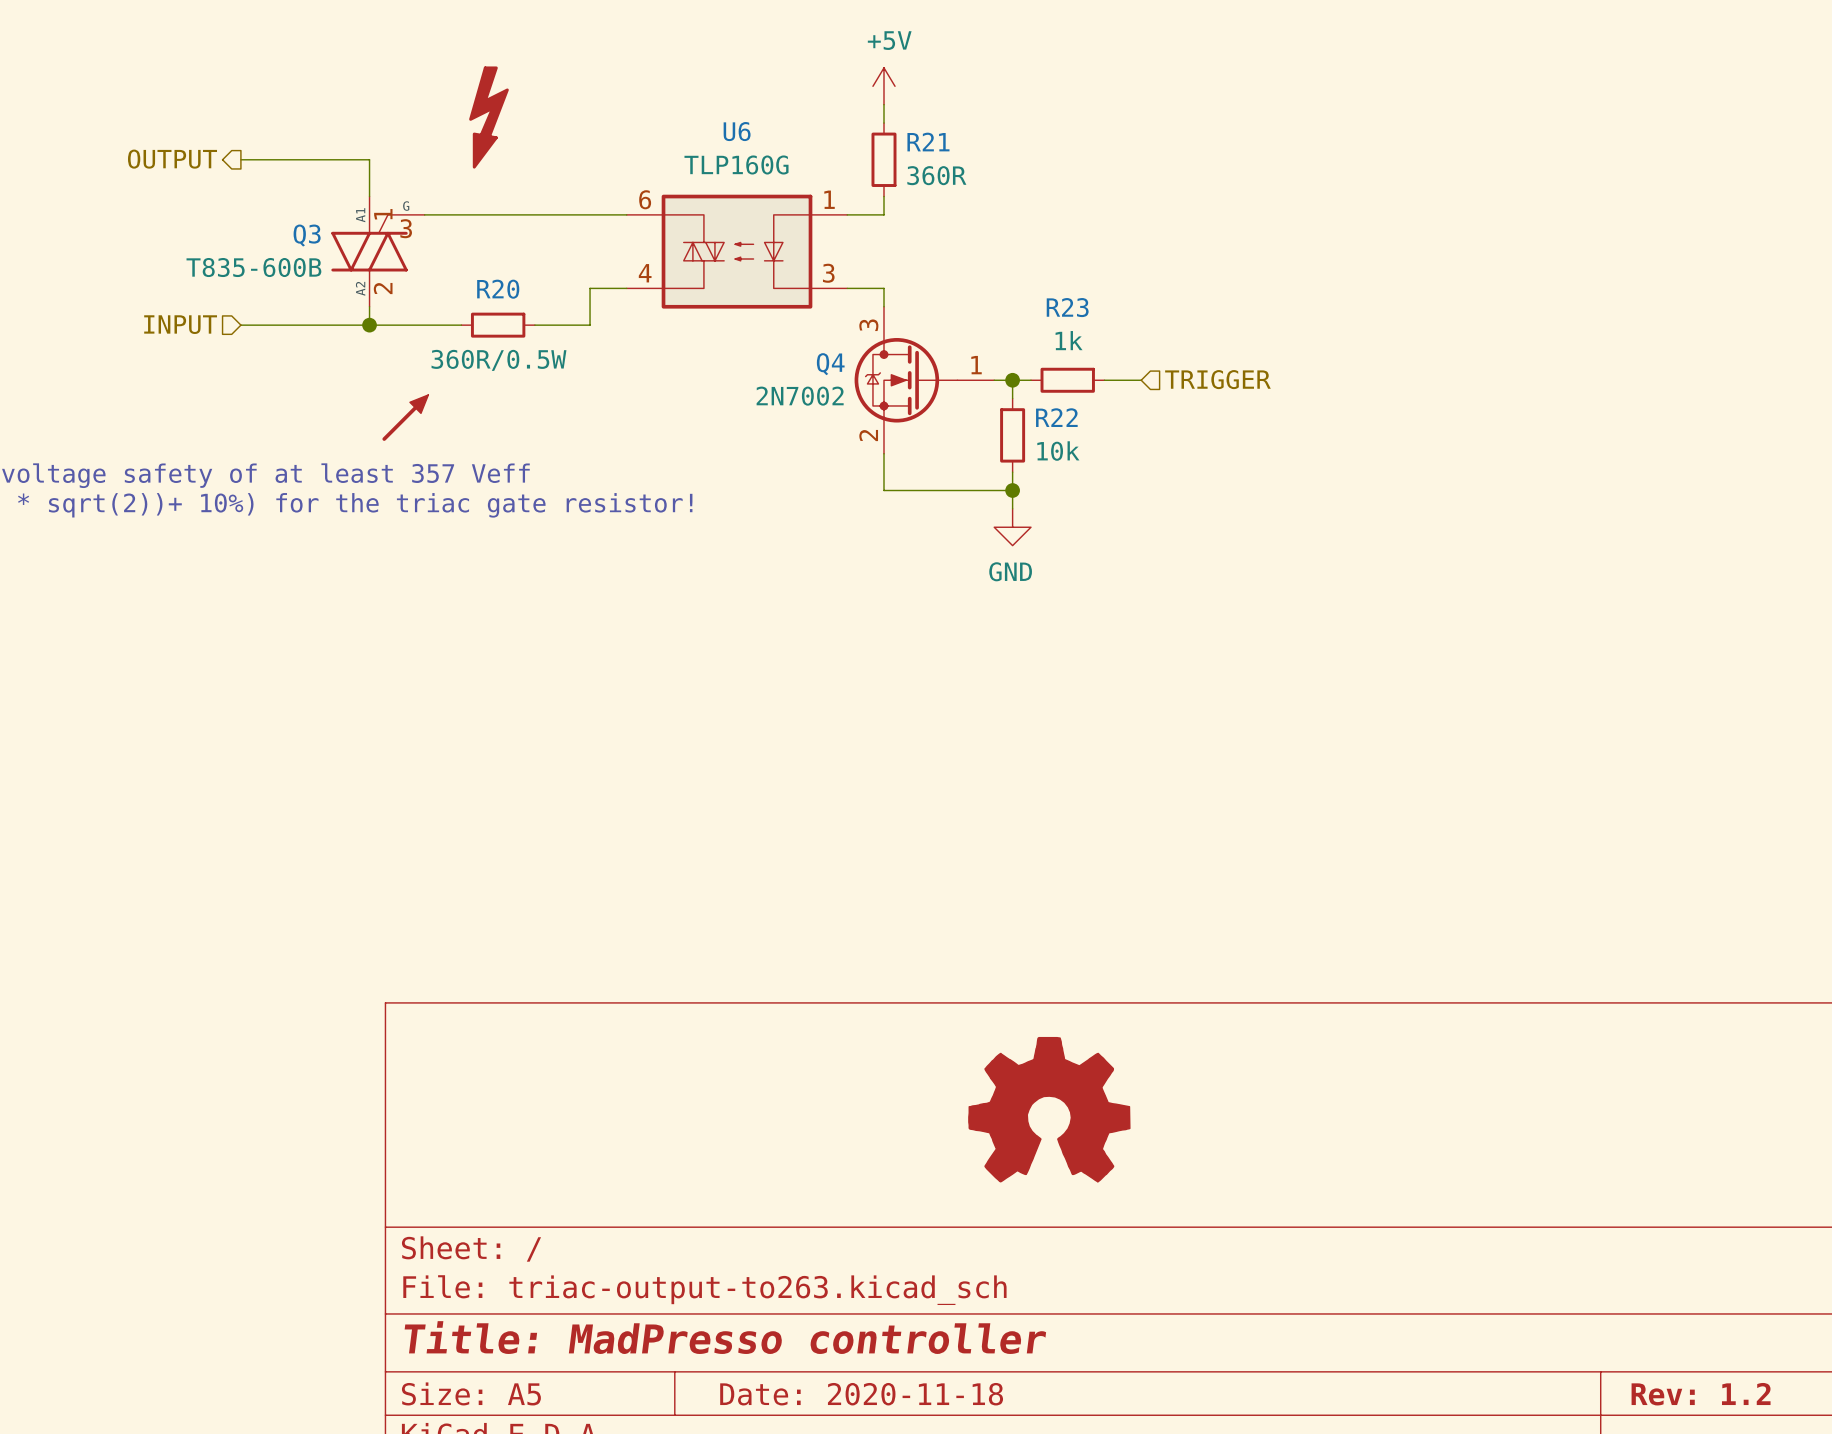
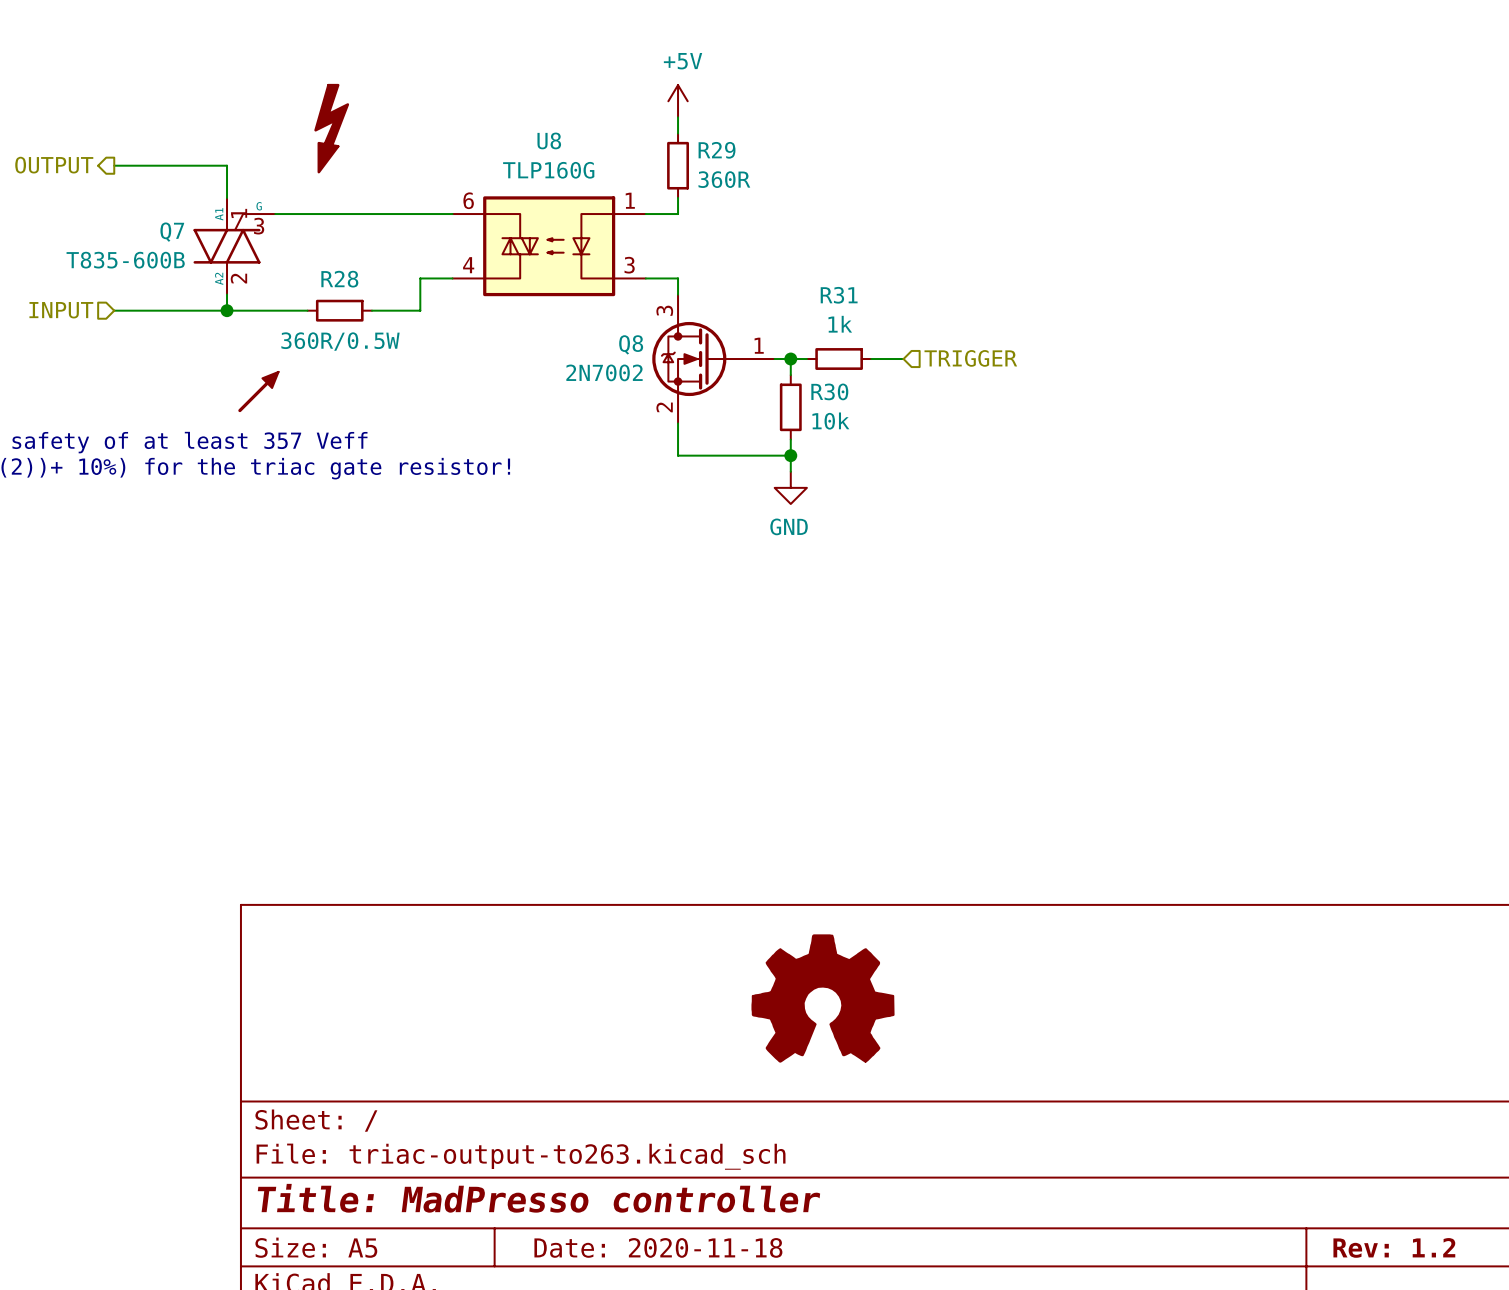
U6 name: U6 (737, 131) -> U8 (549, 140)
R21 name: R21 (928, 142) -> R29 (717, 150)
Q3 name: Q3 (307, 235) -> Q7 (172, 232)
R20 name: R20 (498, 289) -> R28 (339, 279)
R23 name: R23 (1067, 307) -> R31 (839, 295)
Q4 name: Q4 (830, 364) -> Q8 (631, 344)
R22 name: R22 (1056, 417) -> R30 (829, 391)

